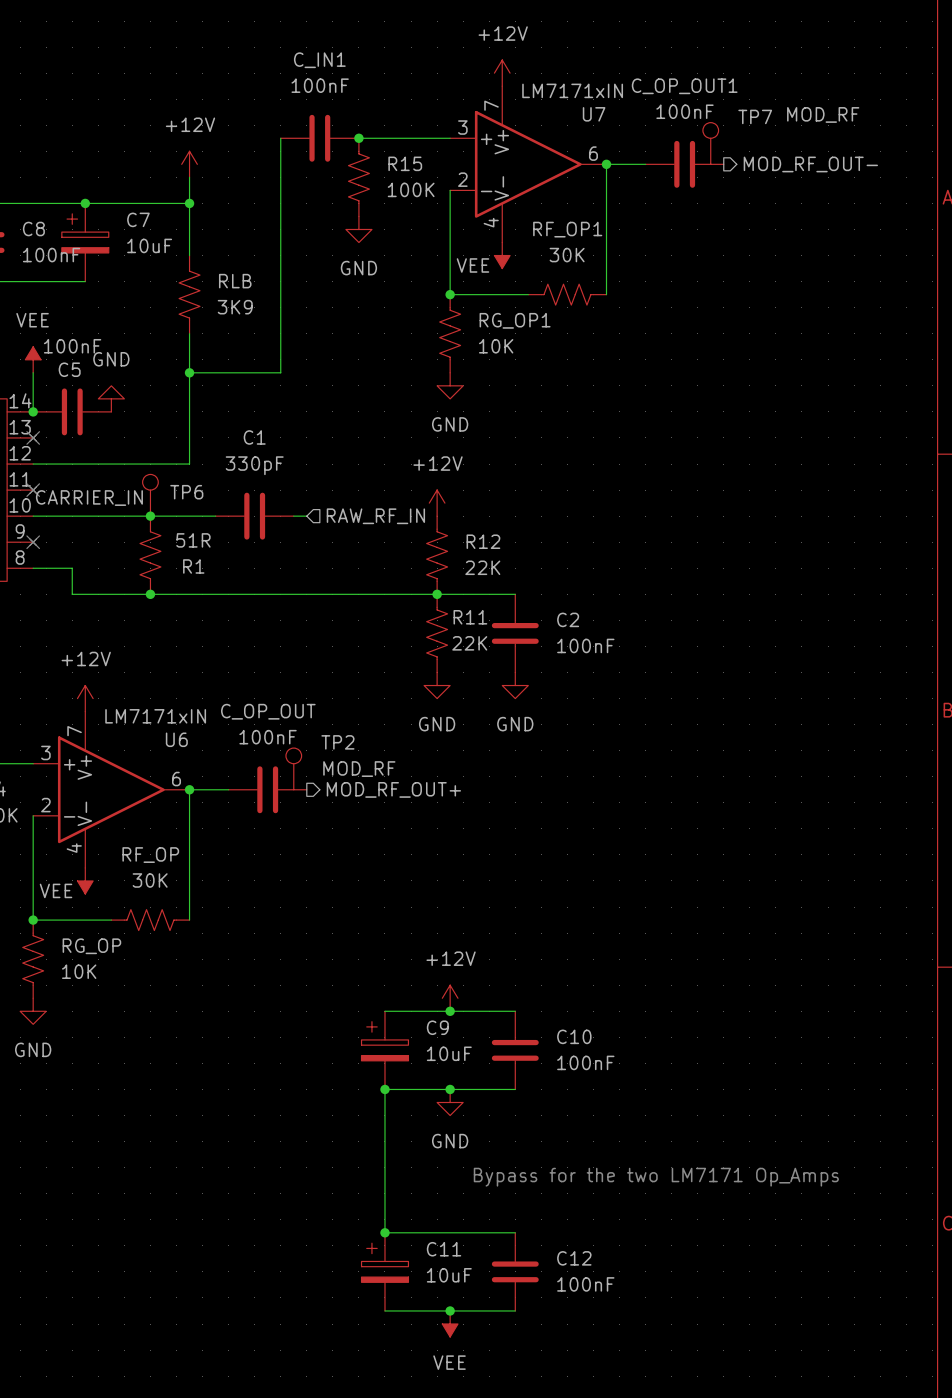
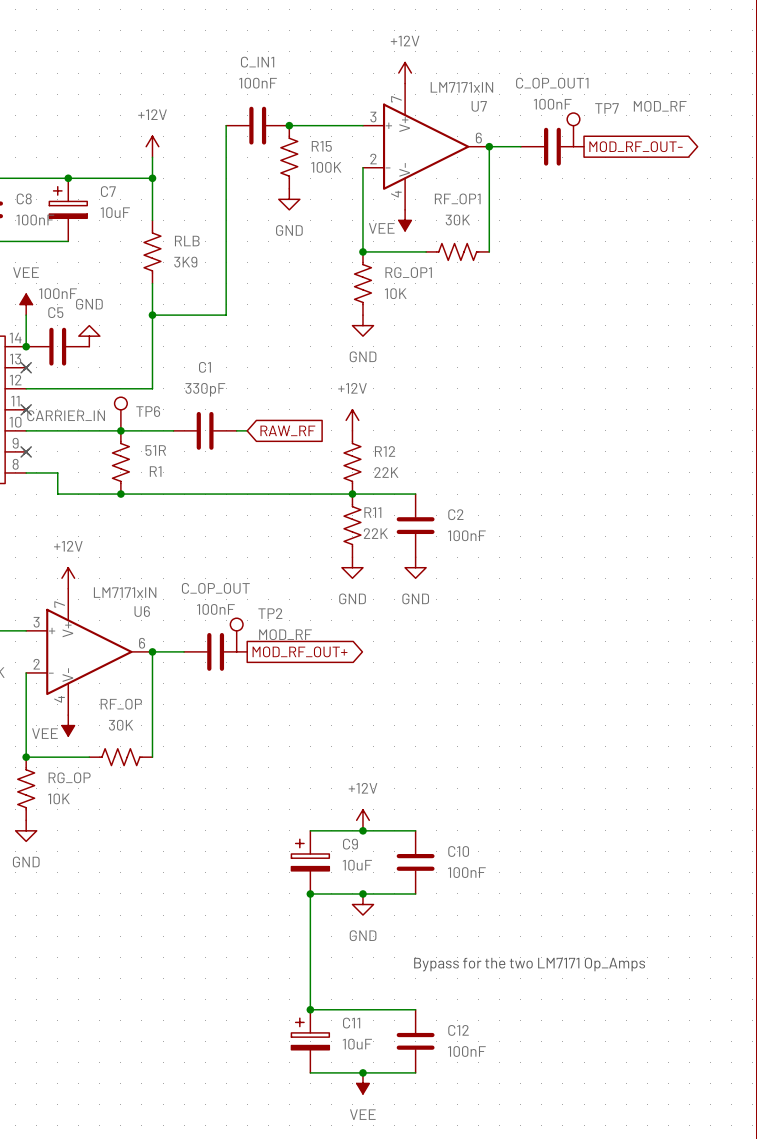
global label: none -> MOD_RF_OUT- (636, 146)
hierarchical label: MOD_RF_OUT- (810, 164) -> none
global label: none -> RAW_RF (287, 430)
hierarchical label: RAW_RF_IN (375, 516) -> none
hierarchical label: MOD_RF_OUT+ (393, 789) -> none
global label: none -> MOD_RF_OUT+ (300, 651)

